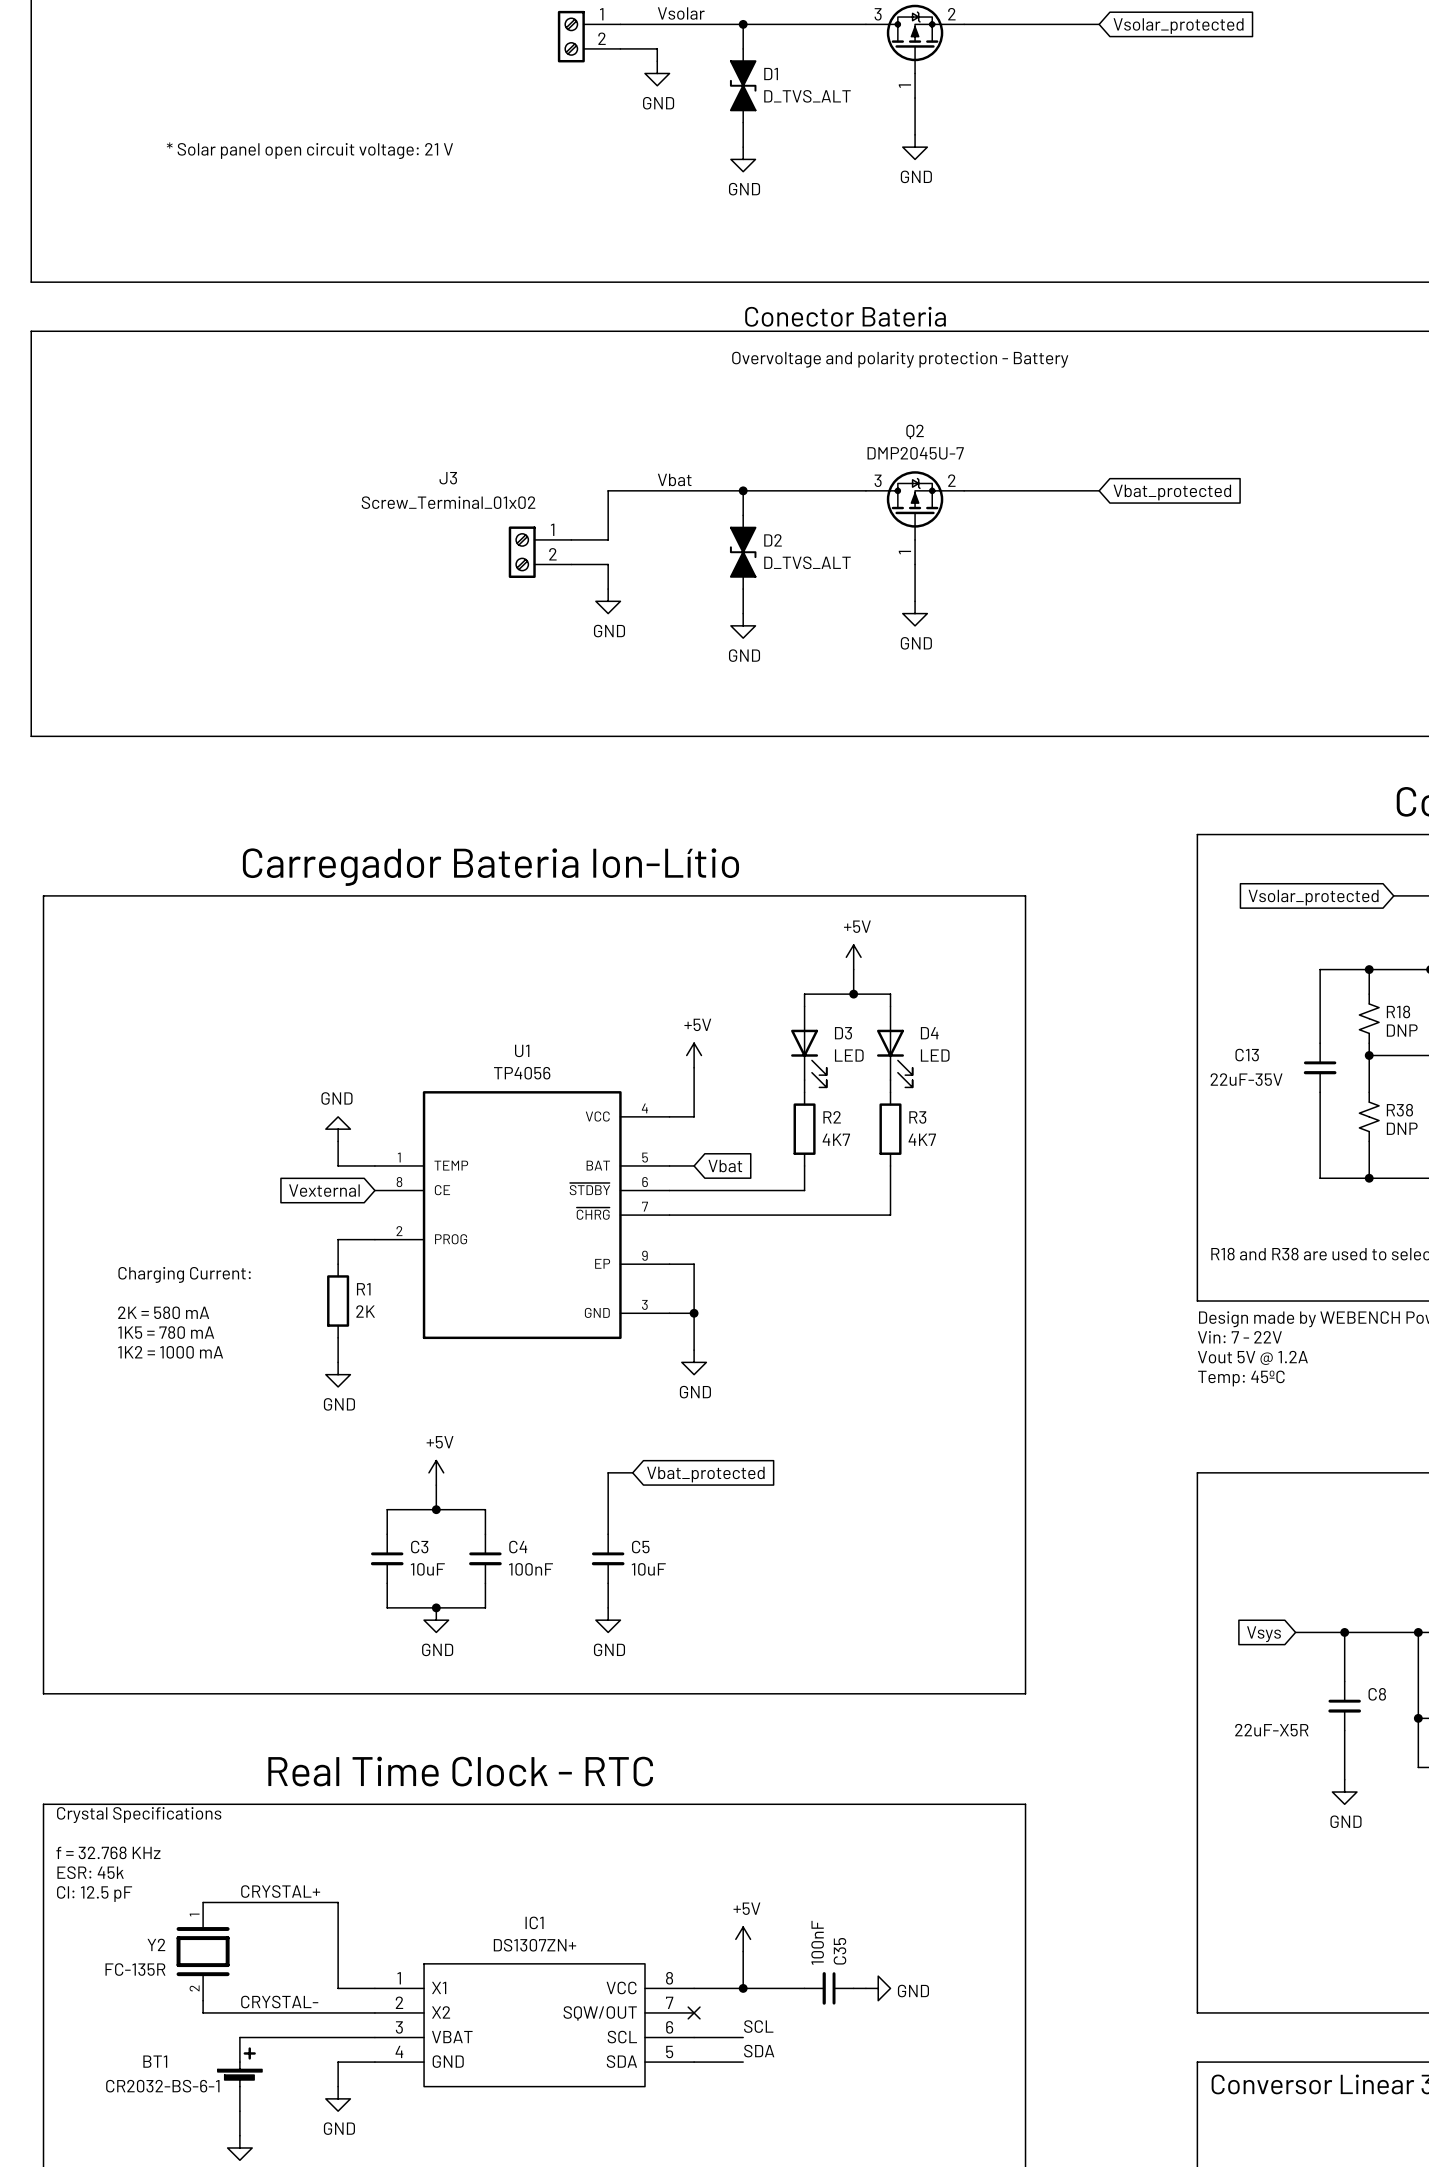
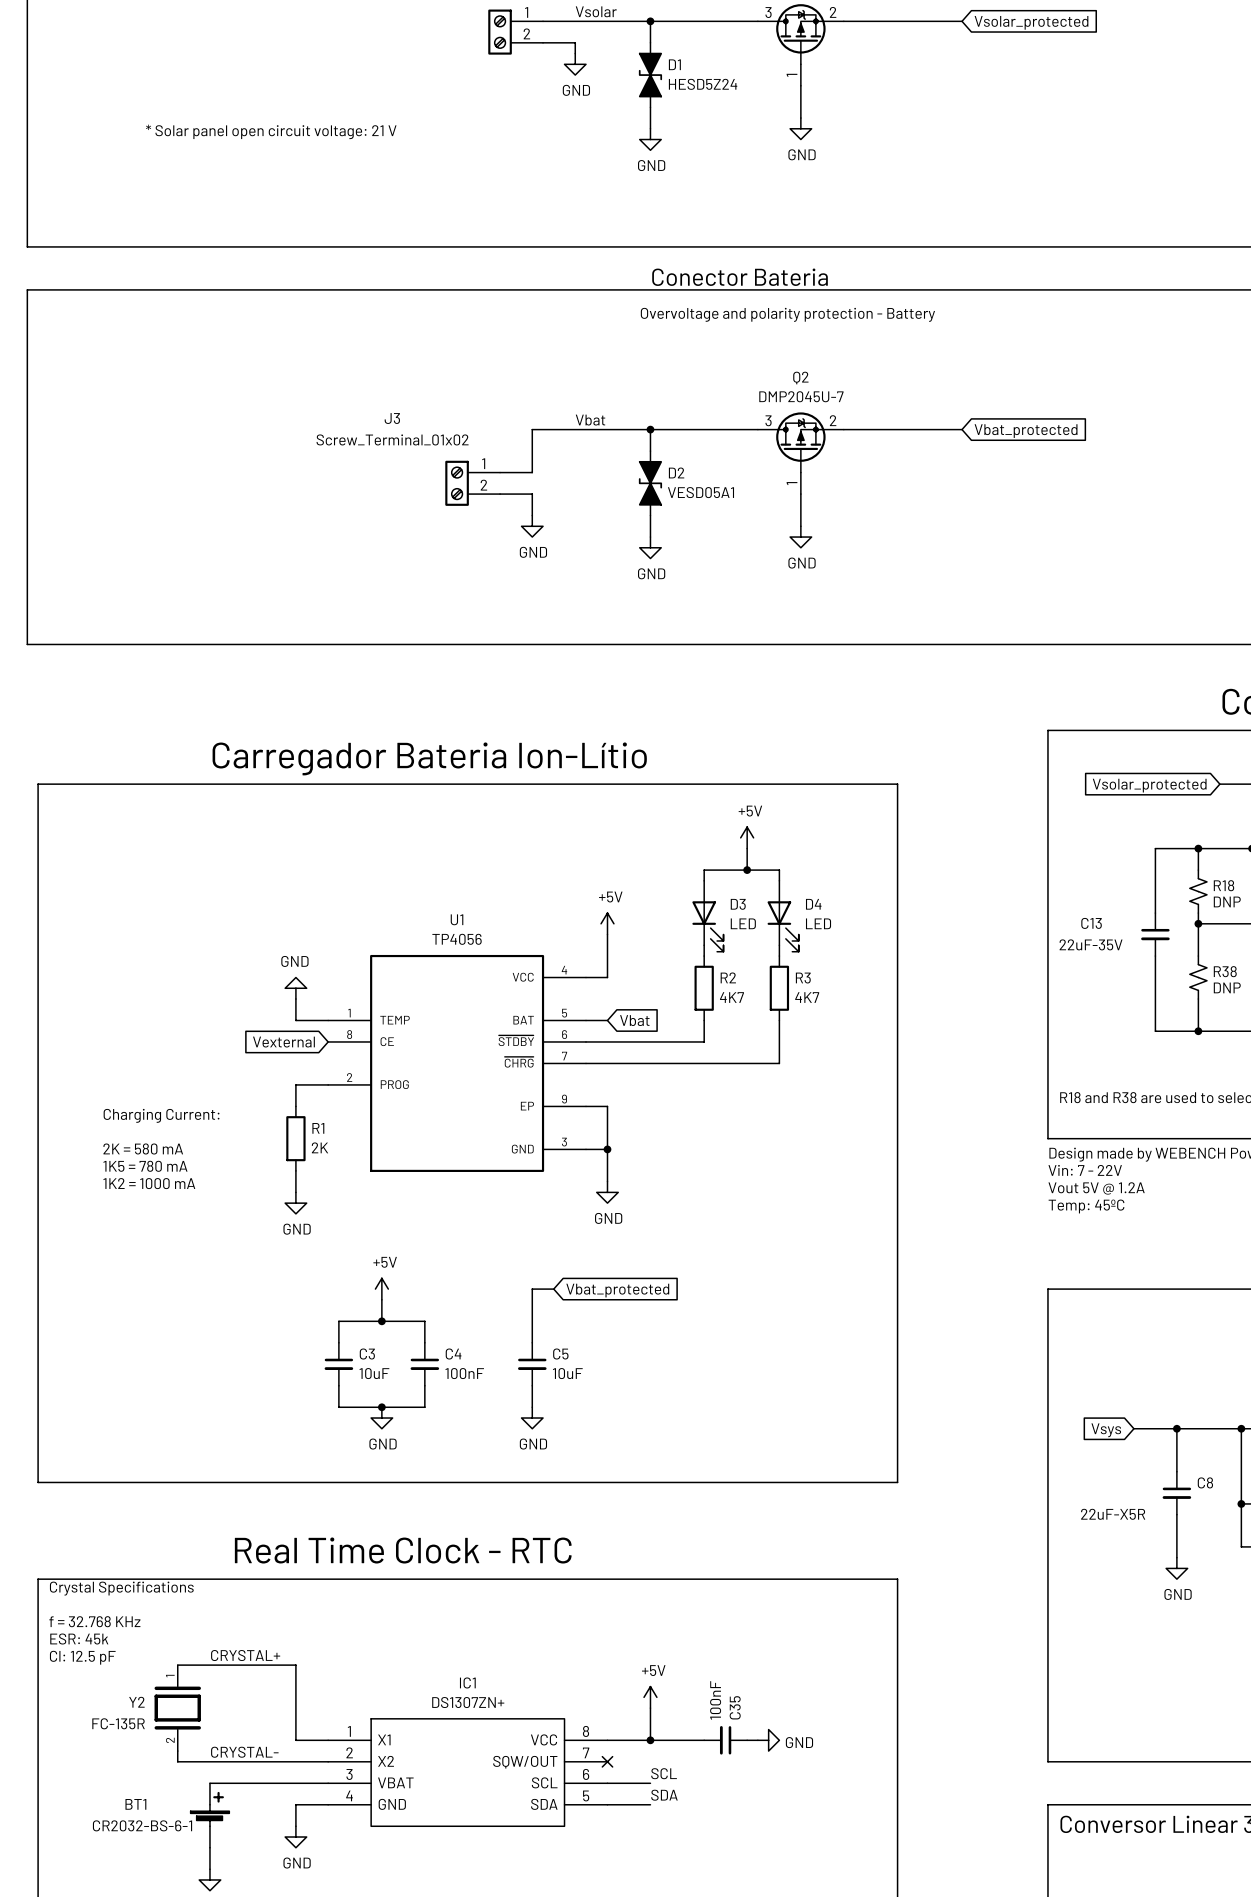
D1 value: D_TVS_ALT (807, 96) -> HESD5Z24 (703, 84)
D2 value: D_TVS_ALT (807, 562) -> VESD05A1 (701, 492)

